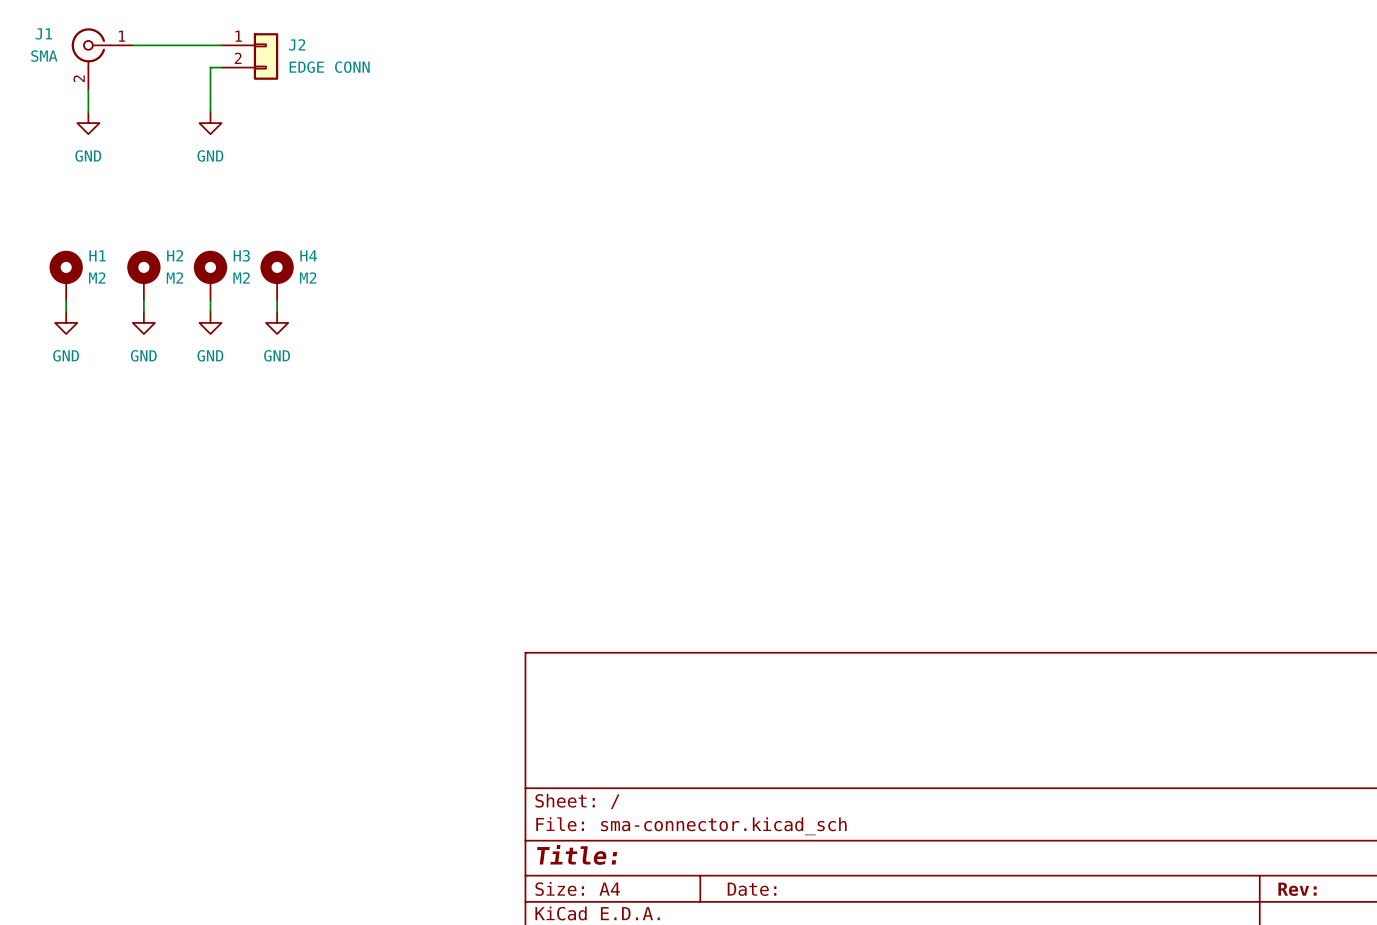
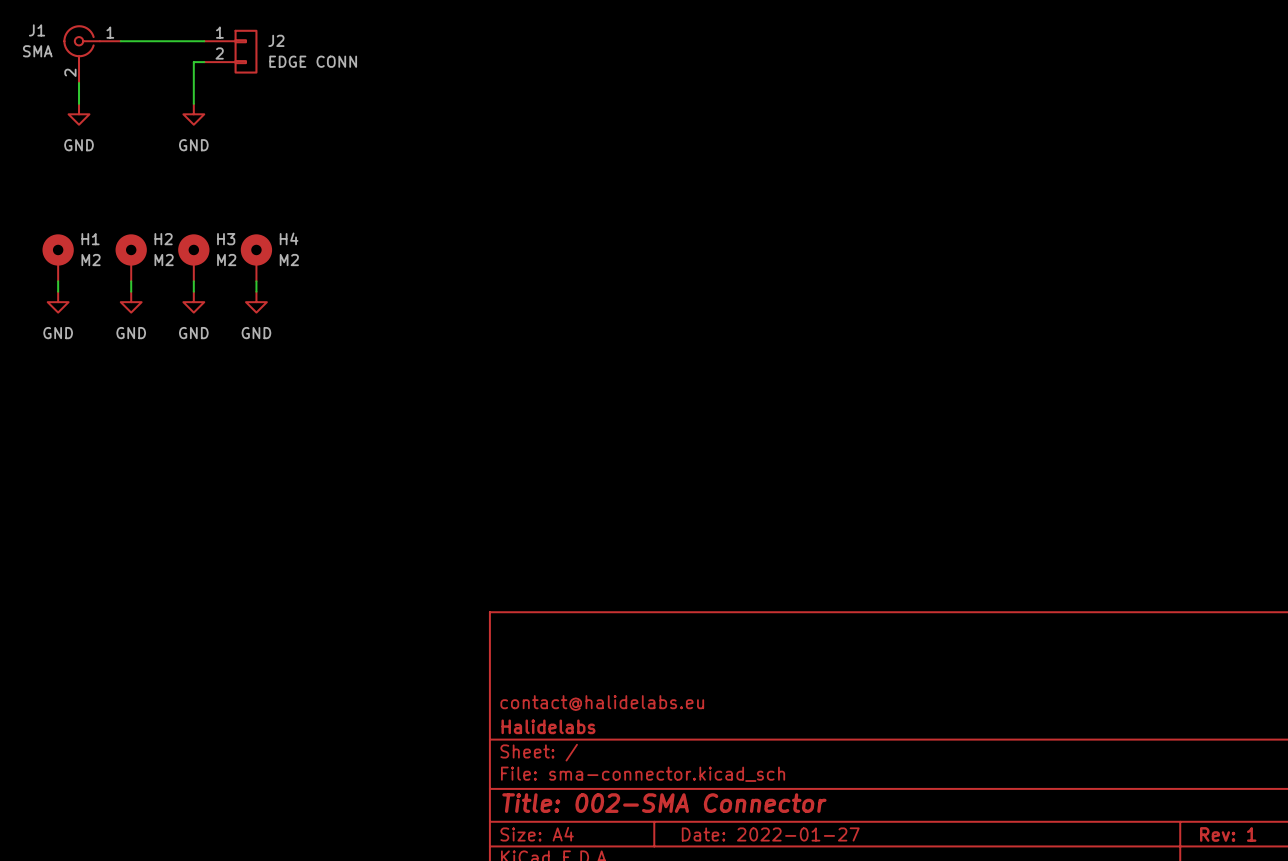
title block: none -> contact@halidelabs.eu (602, 703)
title block: none -> Halidelabs (548, 726)
title block: Title: (577, 854) -> Title: 002-SMA Connector (664, 803)
title block: Date: (752, 889) -> Date: 2022-01-27 (770, 834)
title block: Rev: (1297, 889) -> Rev: 1 (1228, 834)

